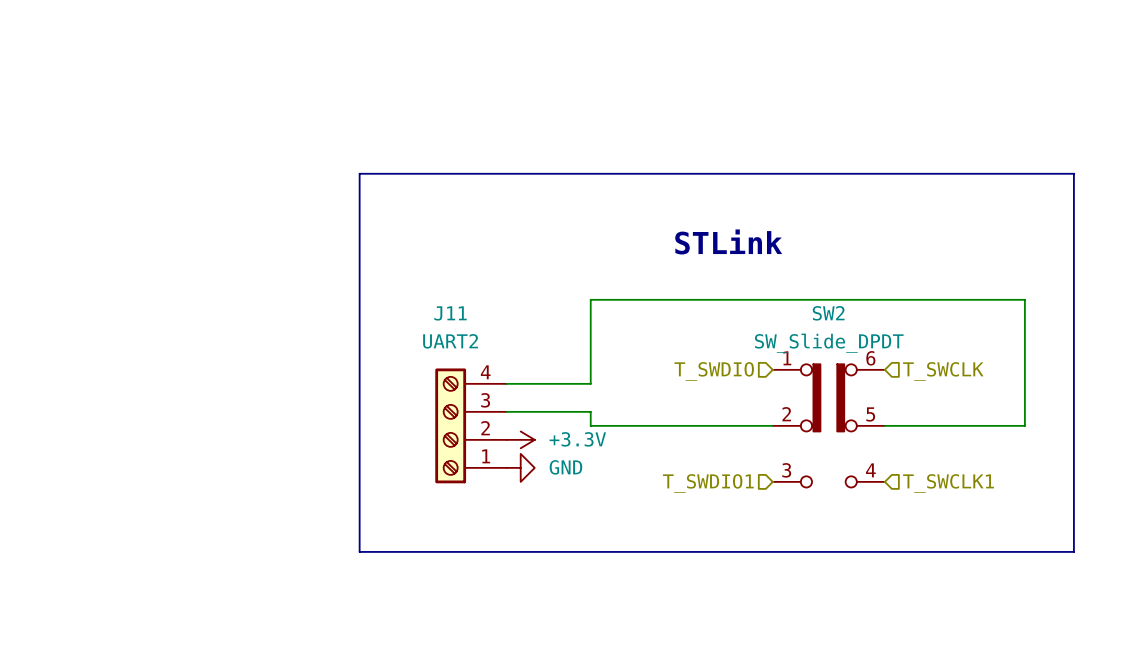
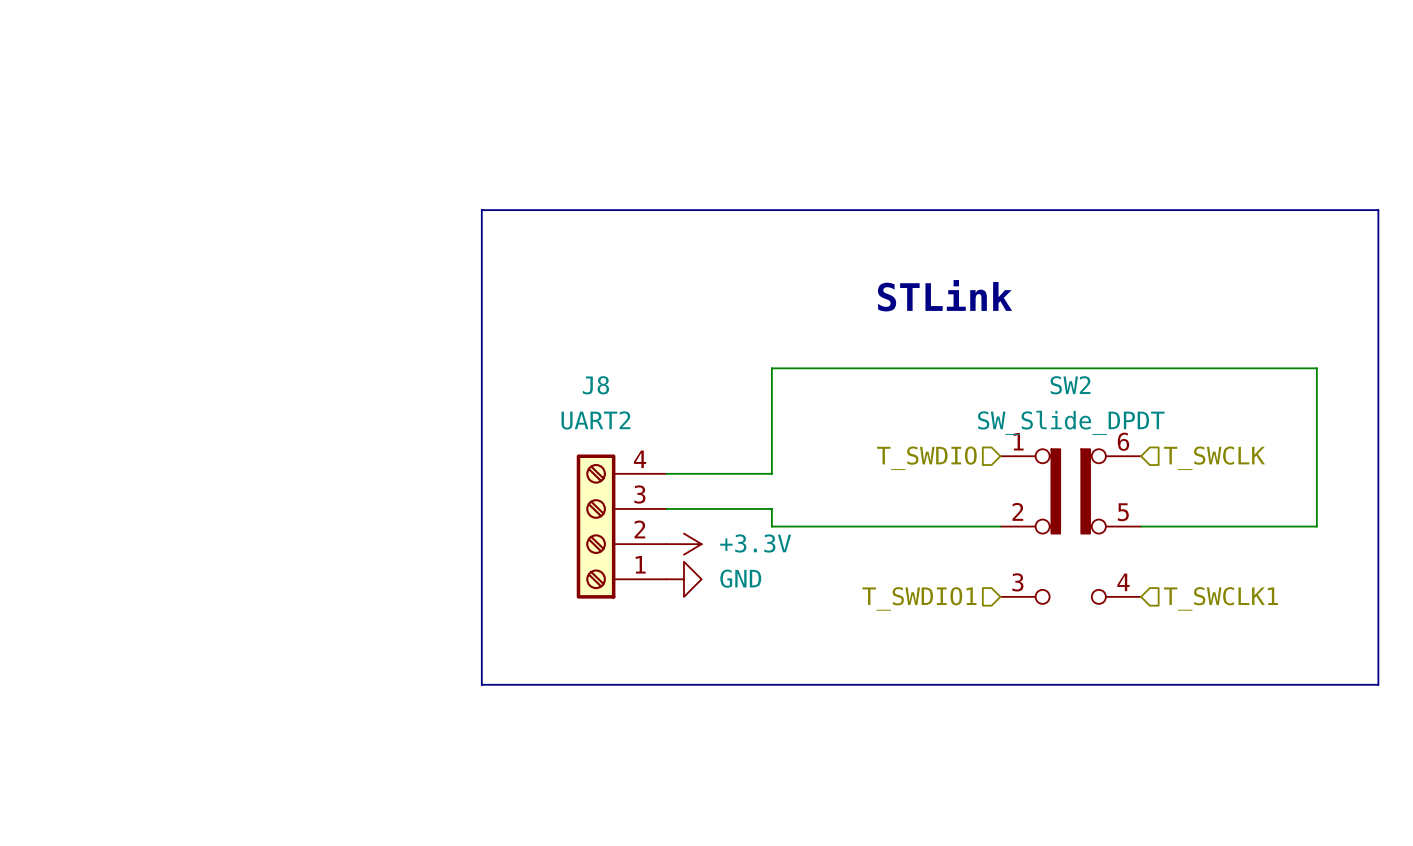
J11 name: J11 (450, 313) -> J8 (595, 385)

